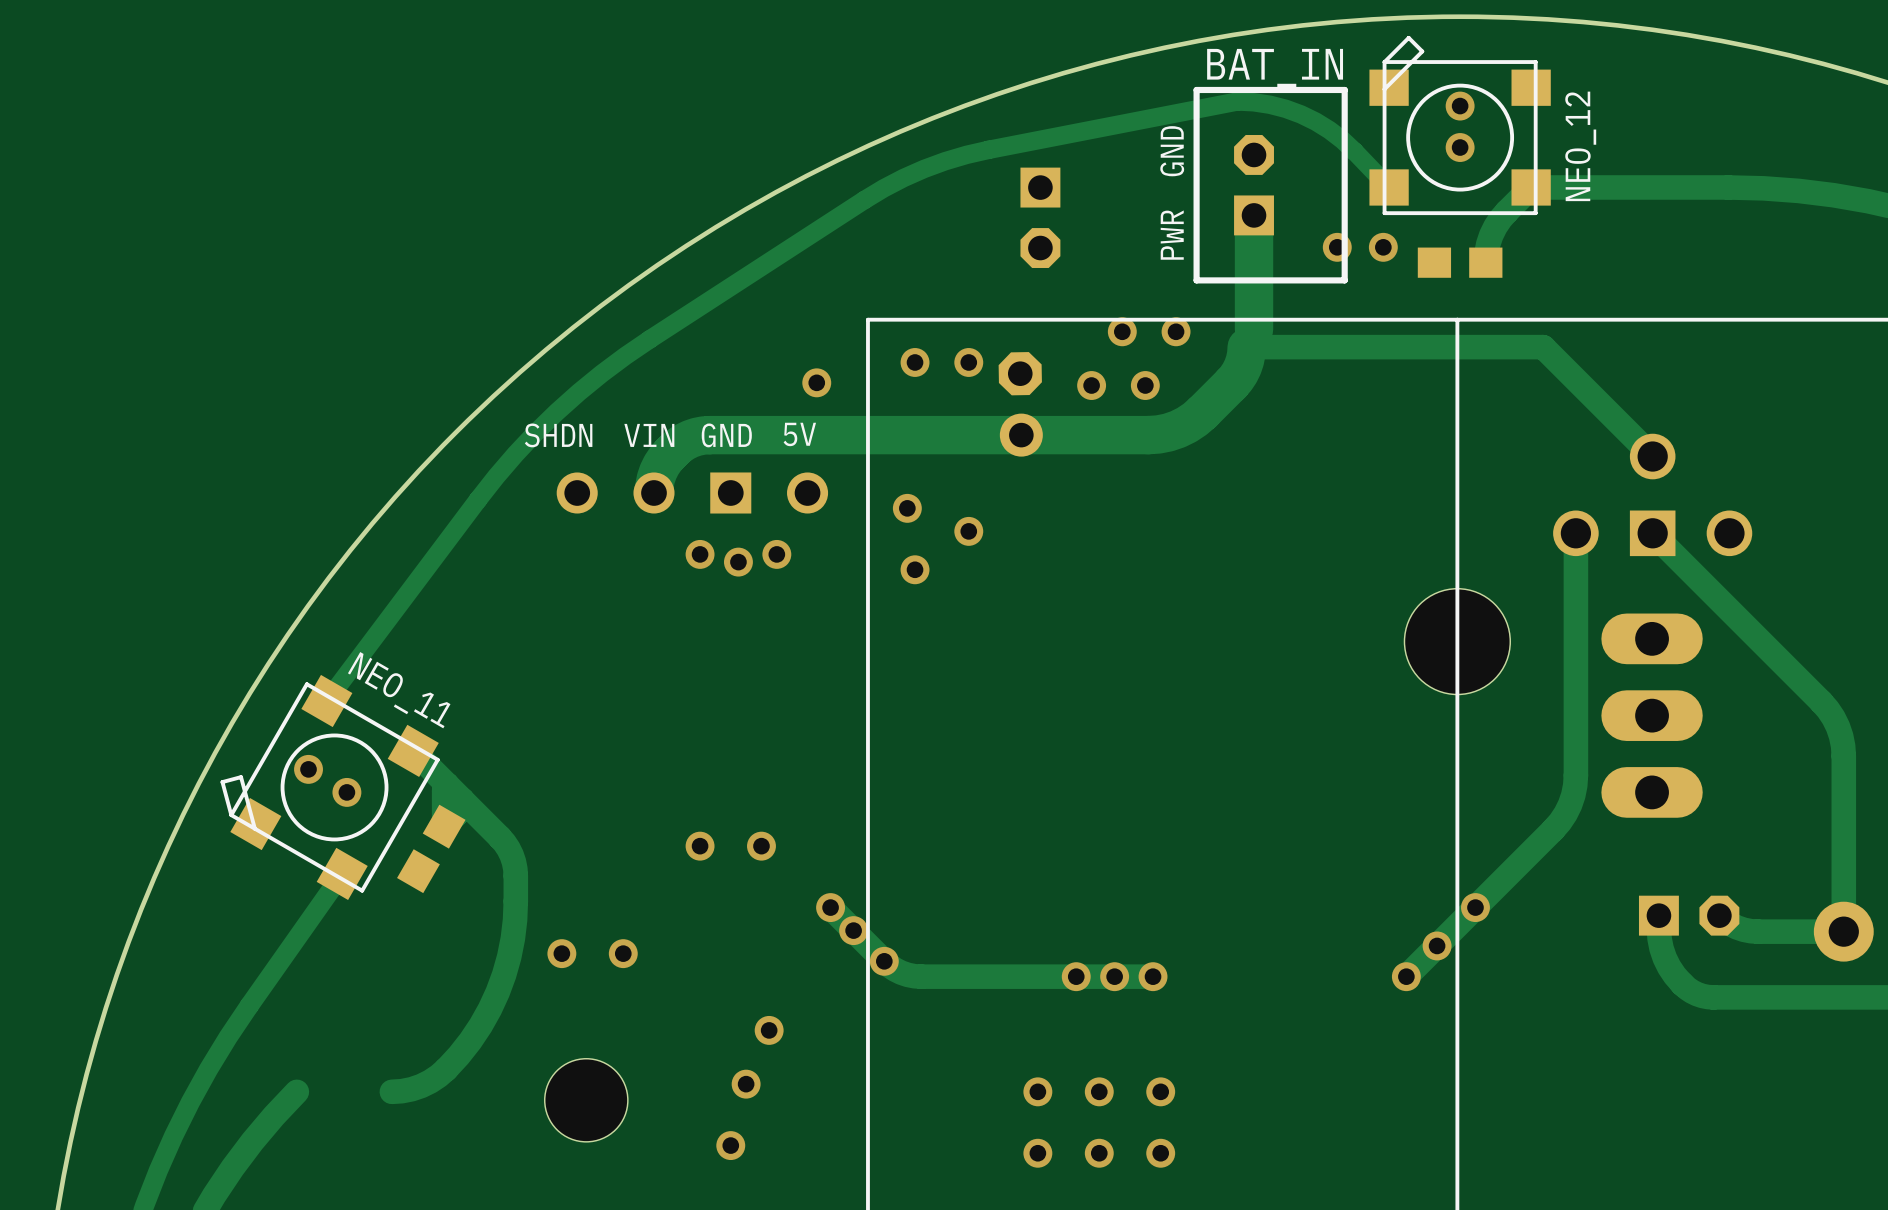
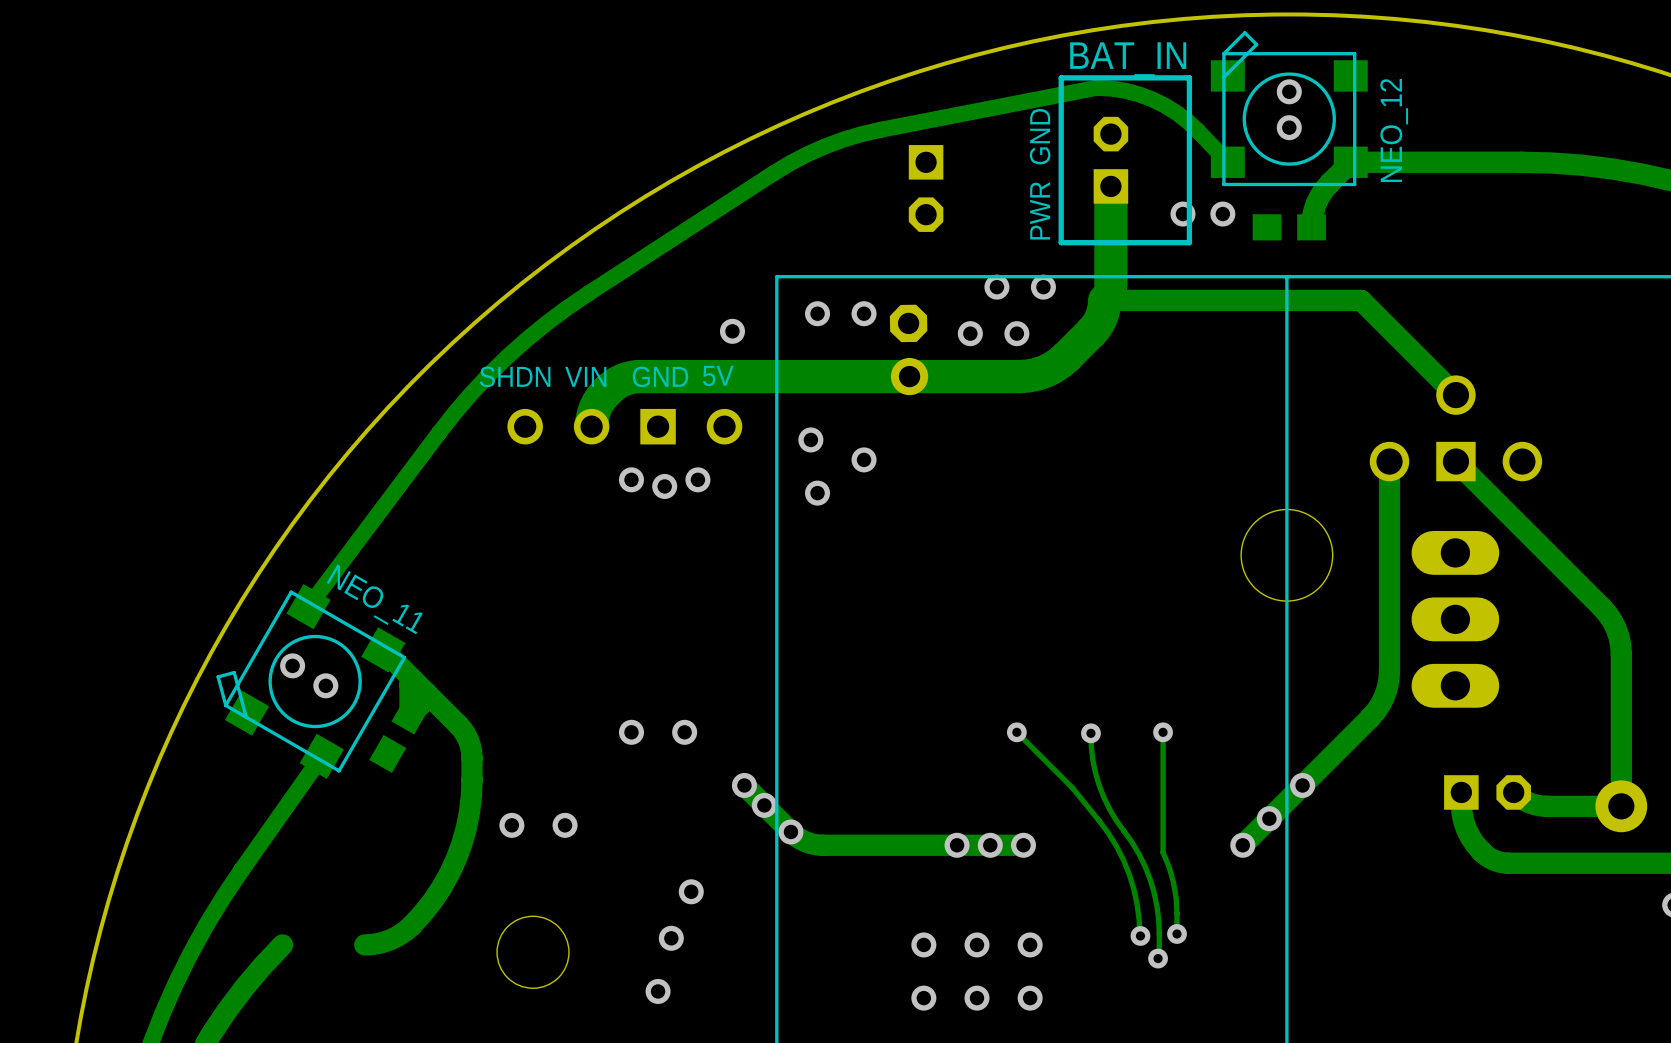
track: none -> (1016, 732) (1072, 787) (1099, 820) (1116, 846) (1133, 889) (1140, 935)
via: none -> (1016, 732)
track: none -> (1163, 732) (1163, 852) (1173, 882) (1176, 897) (1177, 933)
via: none -> (1163, 732)
track: none -> (1090, 733) (1092, 759) (1103, 797) (1116, 820) (1138, 854) (1154, 892) (1158, 920) (1158, 958)
via: none -> (1090, 733)
via: none -> (1177, 933)
via: none -> (1140, 935)
via: none -> (1158, 958)

